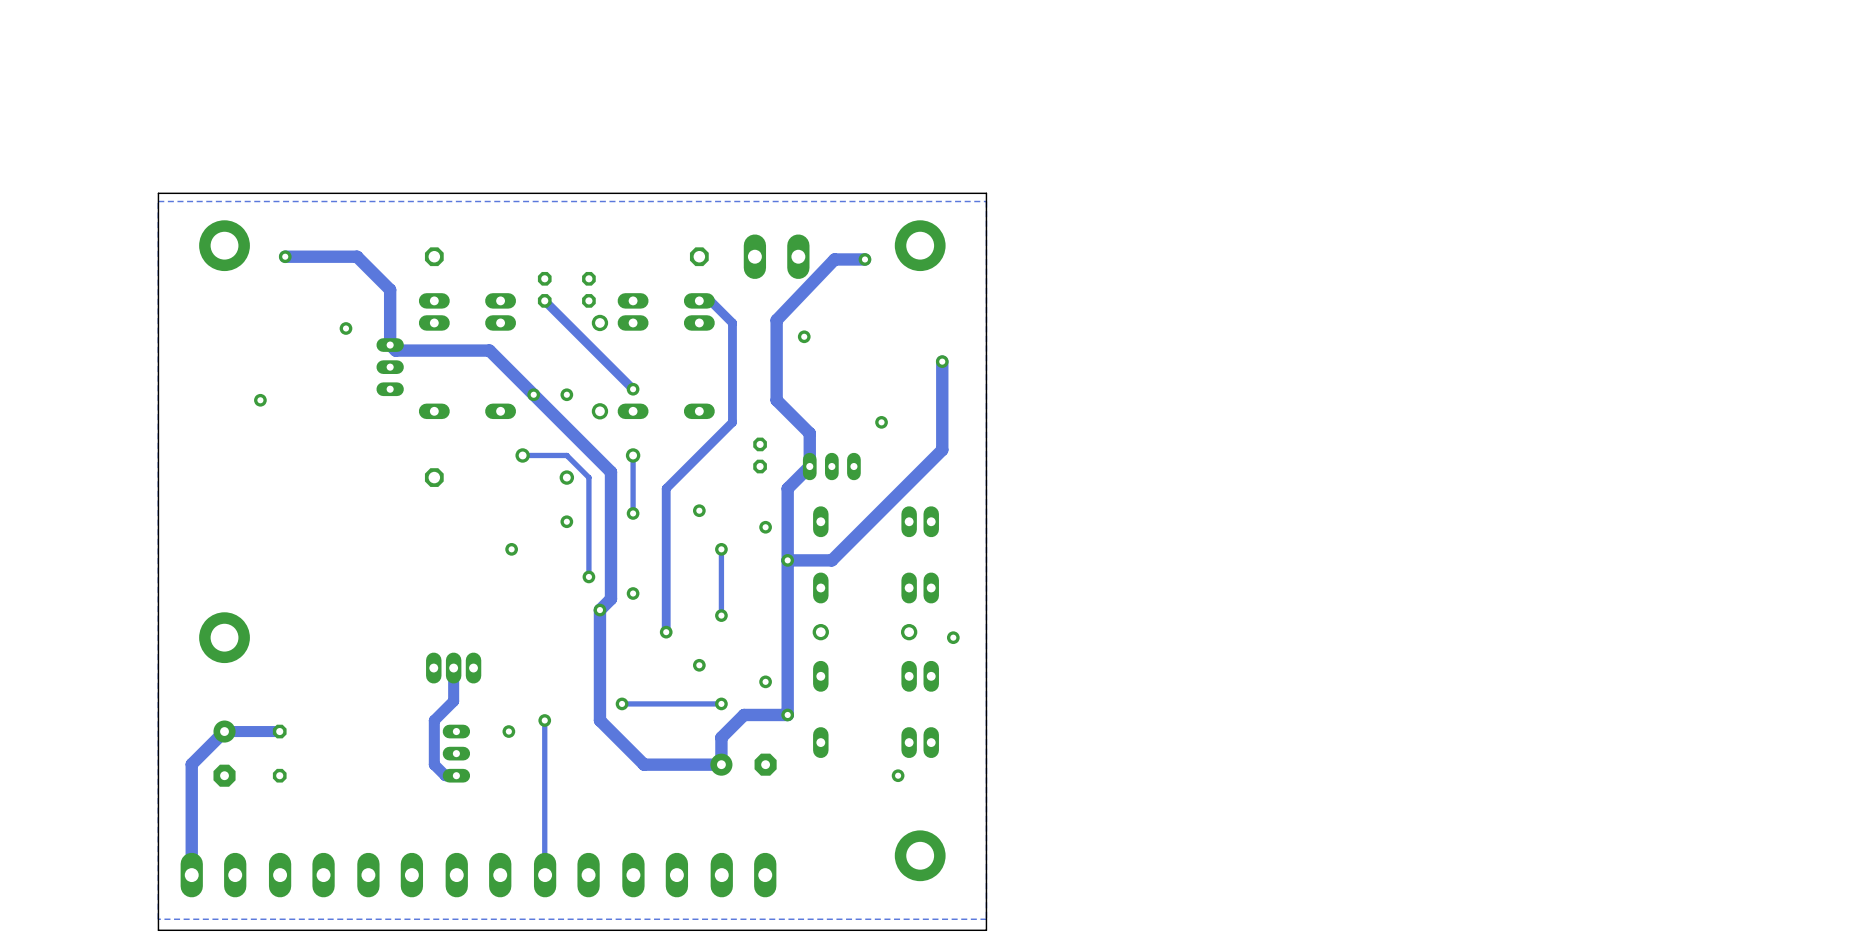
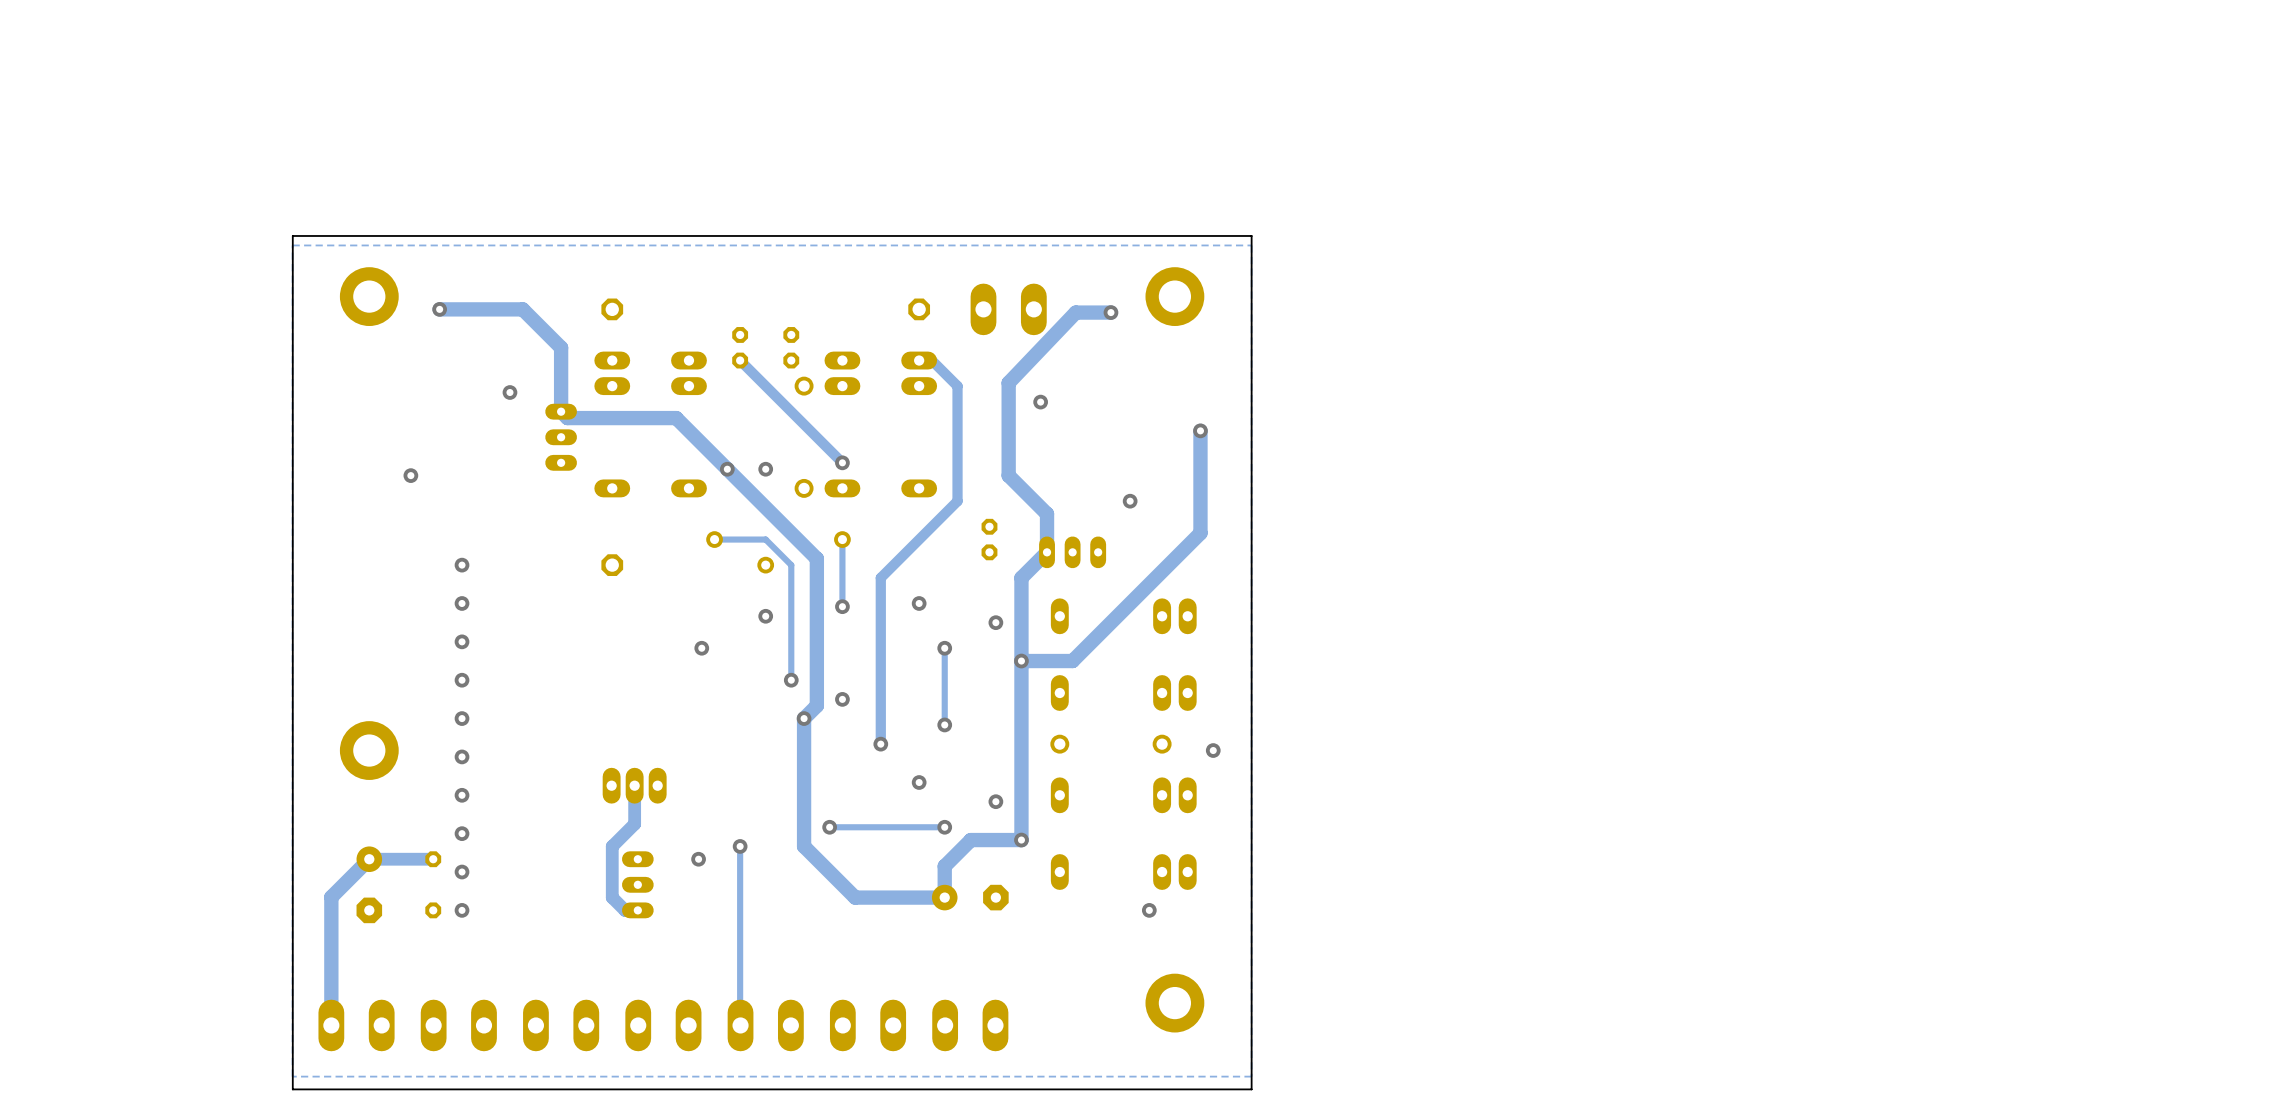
via: none -> (462, 565)
via: none -> (462, 603)
via: none -> (462, 641)
via: none -> (462, 680)
via: none -> (462, 718)
via: none -> (462, 756)
via: none -> (462, 795)
via: none -> (462, 833)
via: none -> (462, 872)
via: none -> (462, 910)

